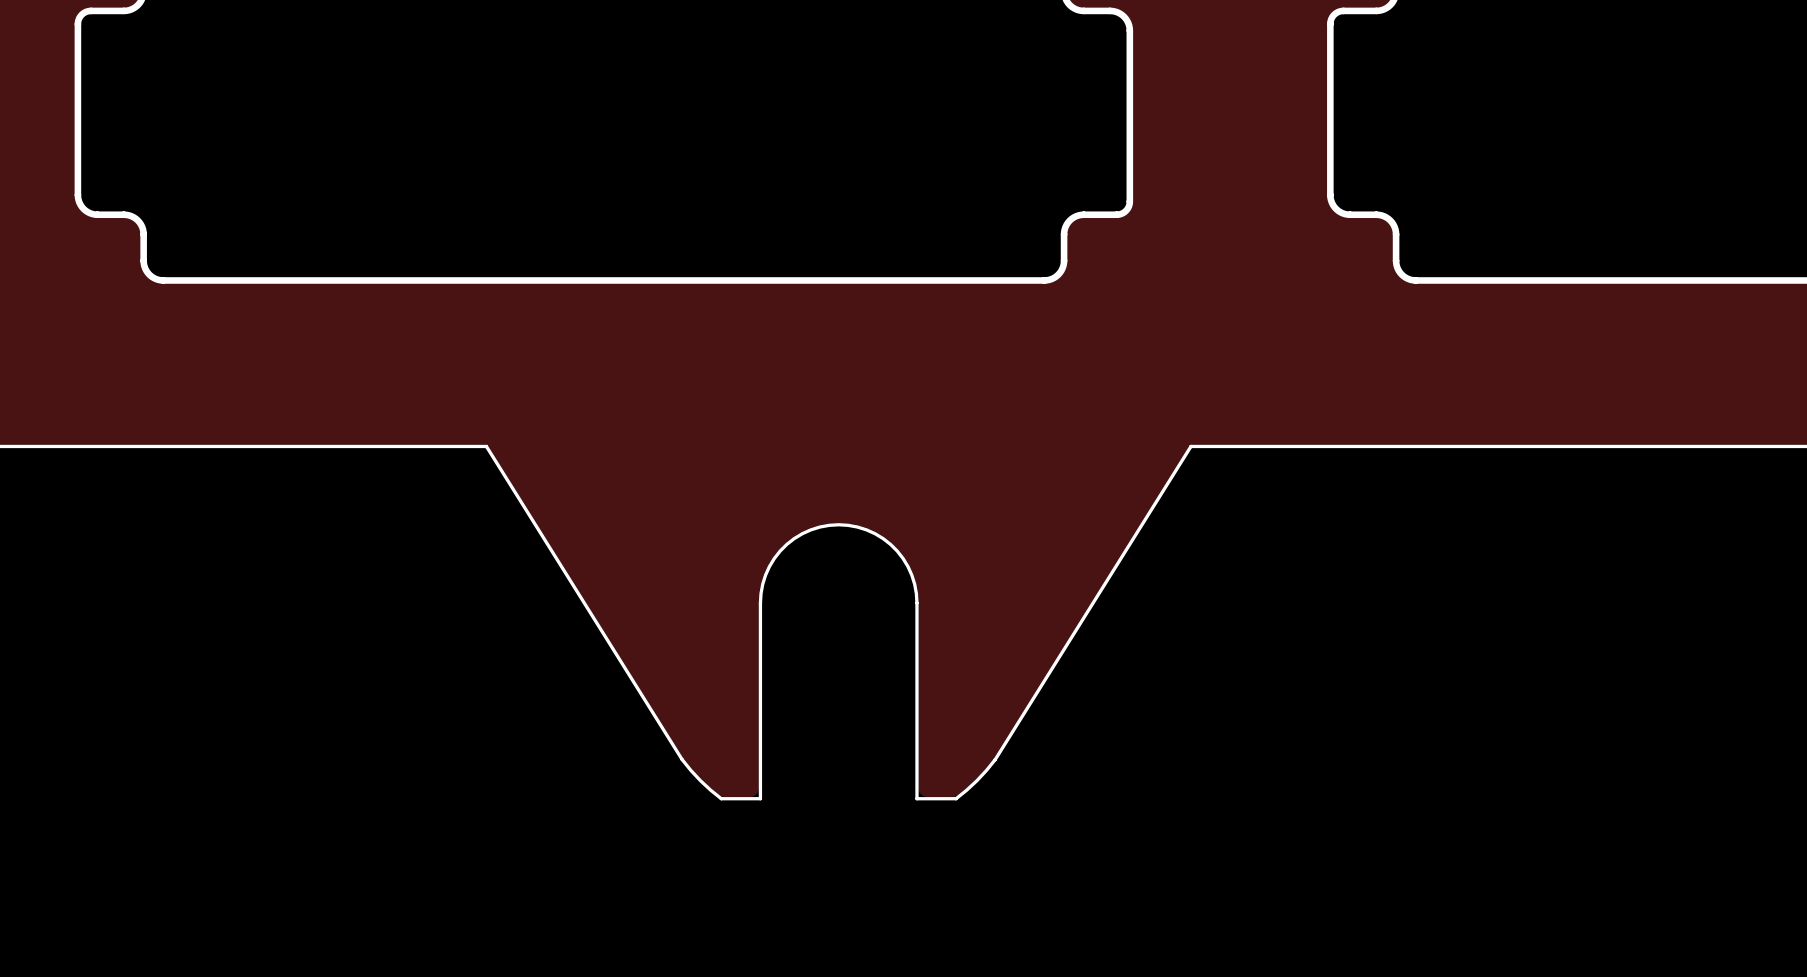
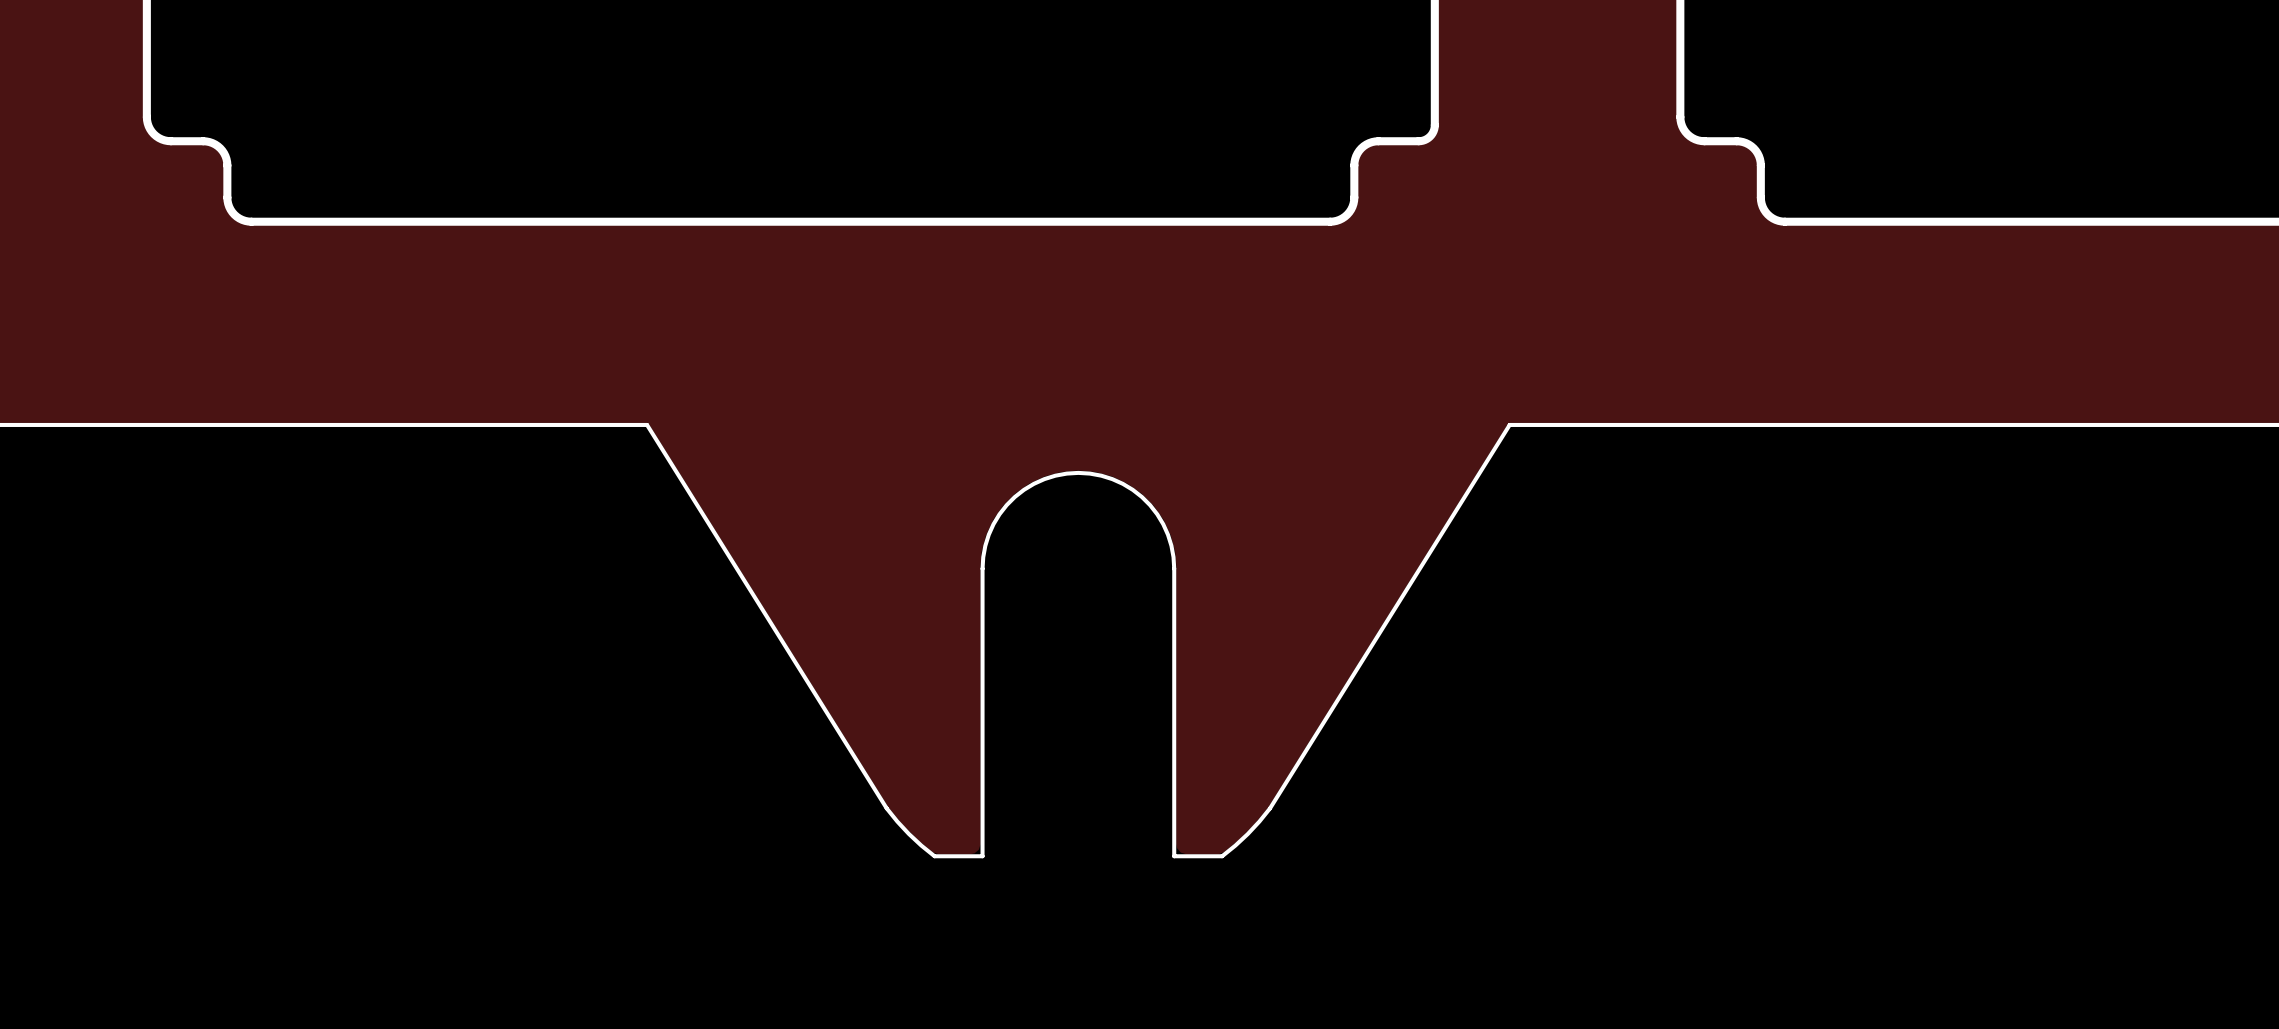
board edge: (760, 603) (765, 575) (780, 551) (794, 538) (810, 529) (838, 524) (866, 529) (883, 538) (897, 551) (911, 575) (916, 603) -> (982, 616) (983, 557) (988, 534) (999, 514) (1014, 496) (1033, 483) (1055, 475) (1078, 472) (1101, 475) (1122, 483) (1141, 496) (1157, 514) (1168, 534) (1173, 557) (1174, 616)

